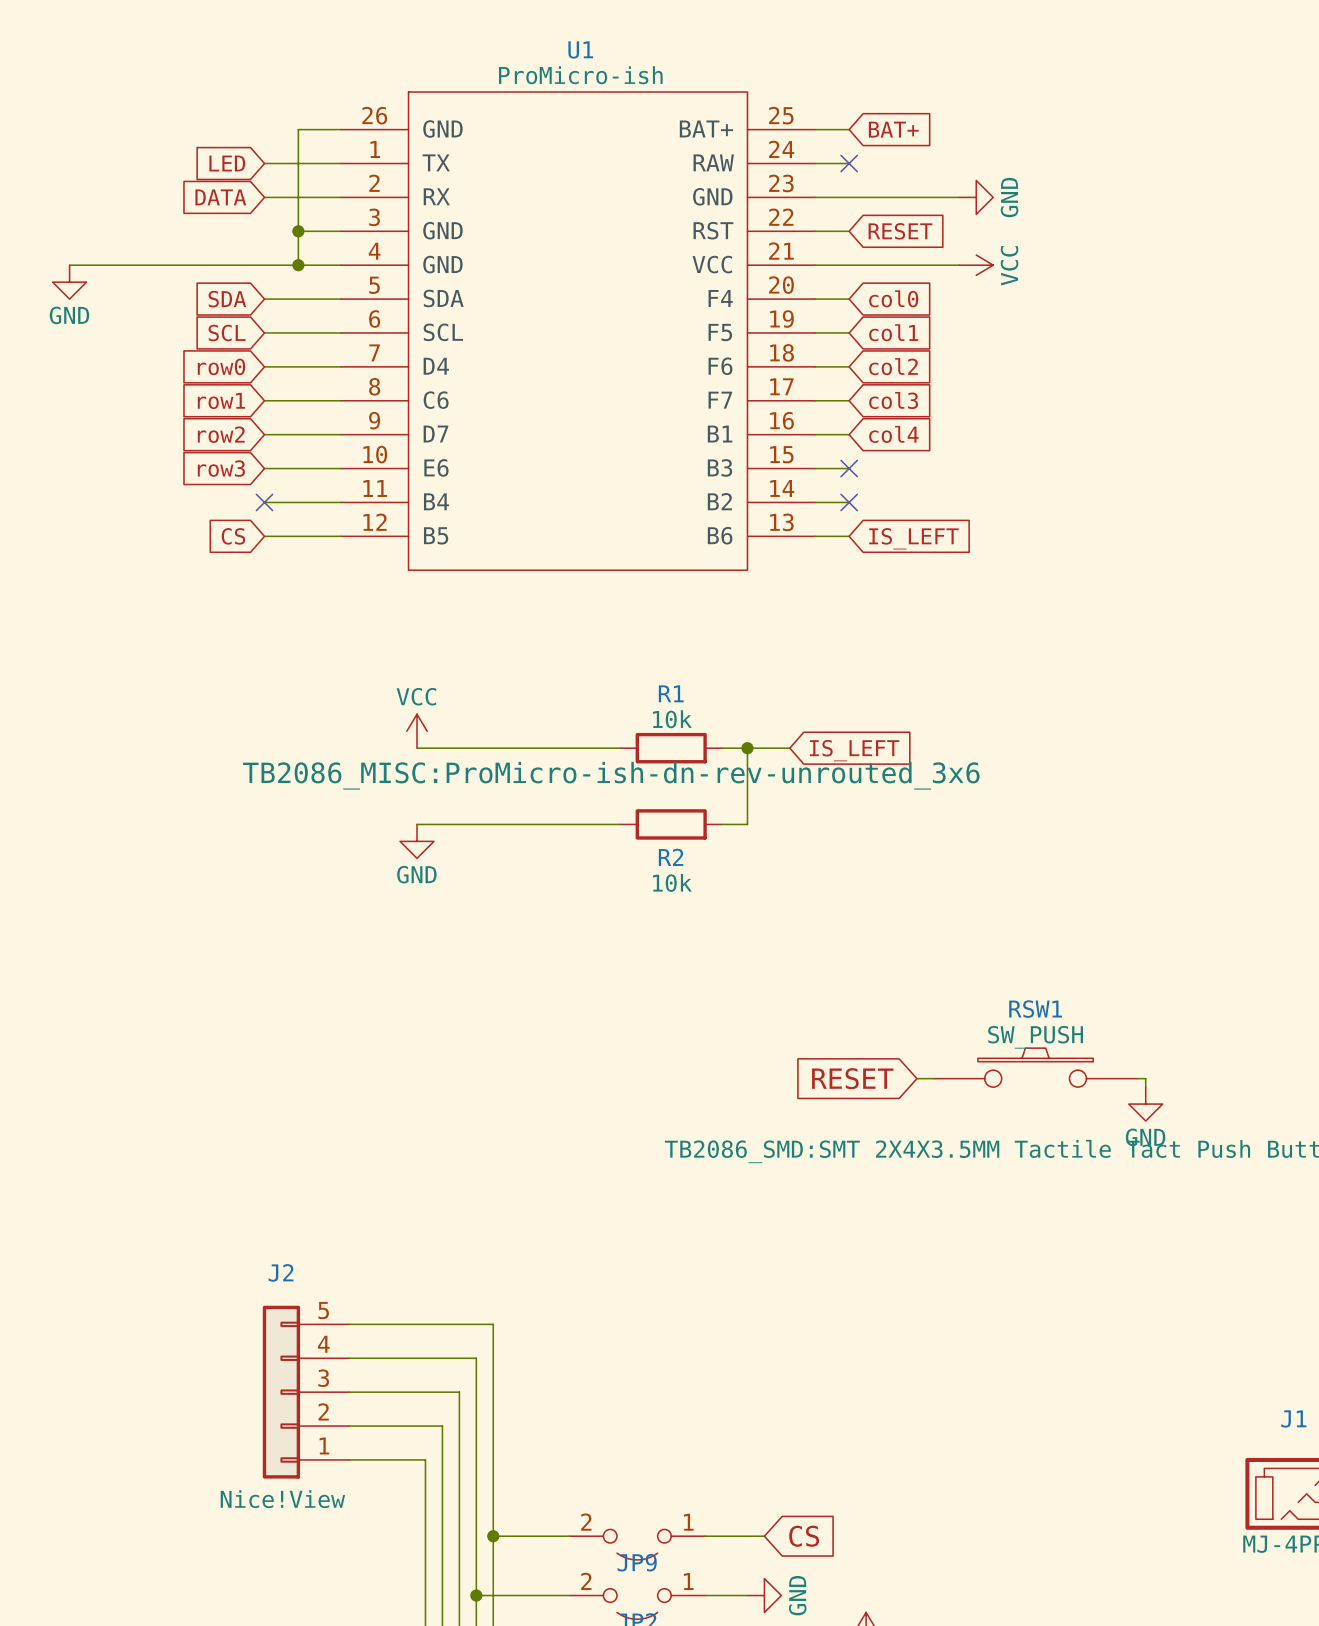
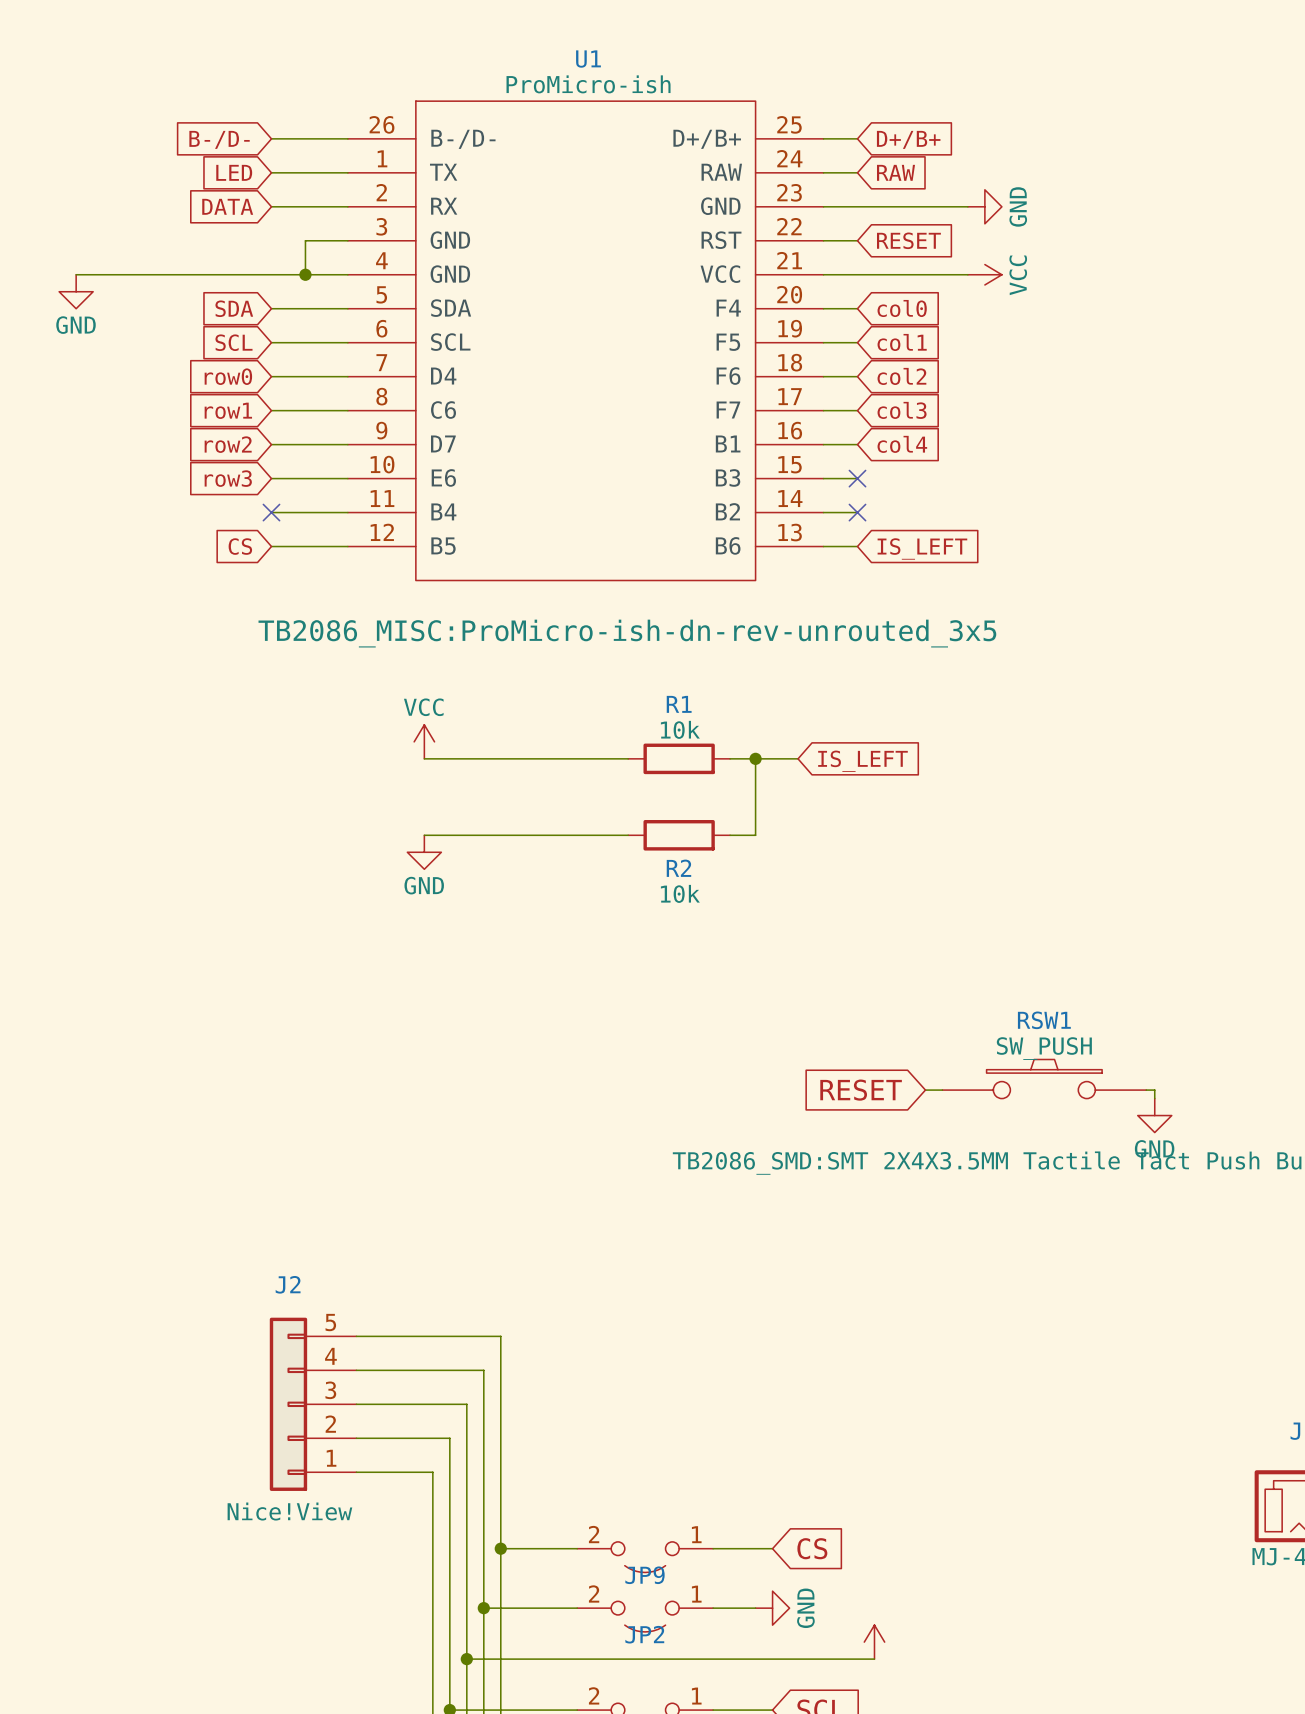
U1 pin name: BAT+ (706, 128) -> D+/B+ (707, 139)
wire: (298, 129) (298, 231) -> (305, 138) (271, 138)
U1 pin name: GND (442, 129) -> B-/D- (463, 139)
global label: BAT+ (893, 129) -> D+/B+ (908, 139)
global label: none -> B-/D- (219, 139)
no-connect mark: (849, 163) -> none
global label: none -> RAW (896, 172)
junction: (298, 231) -> none
U1 text: TB2086_MISC:ProMicro-ish-dn-rev-unrouted_3x6 (611, 775) -> TB2086_MISC:ProMicro-ish-dn-rev-unrouted_3x5 (627, 633)

